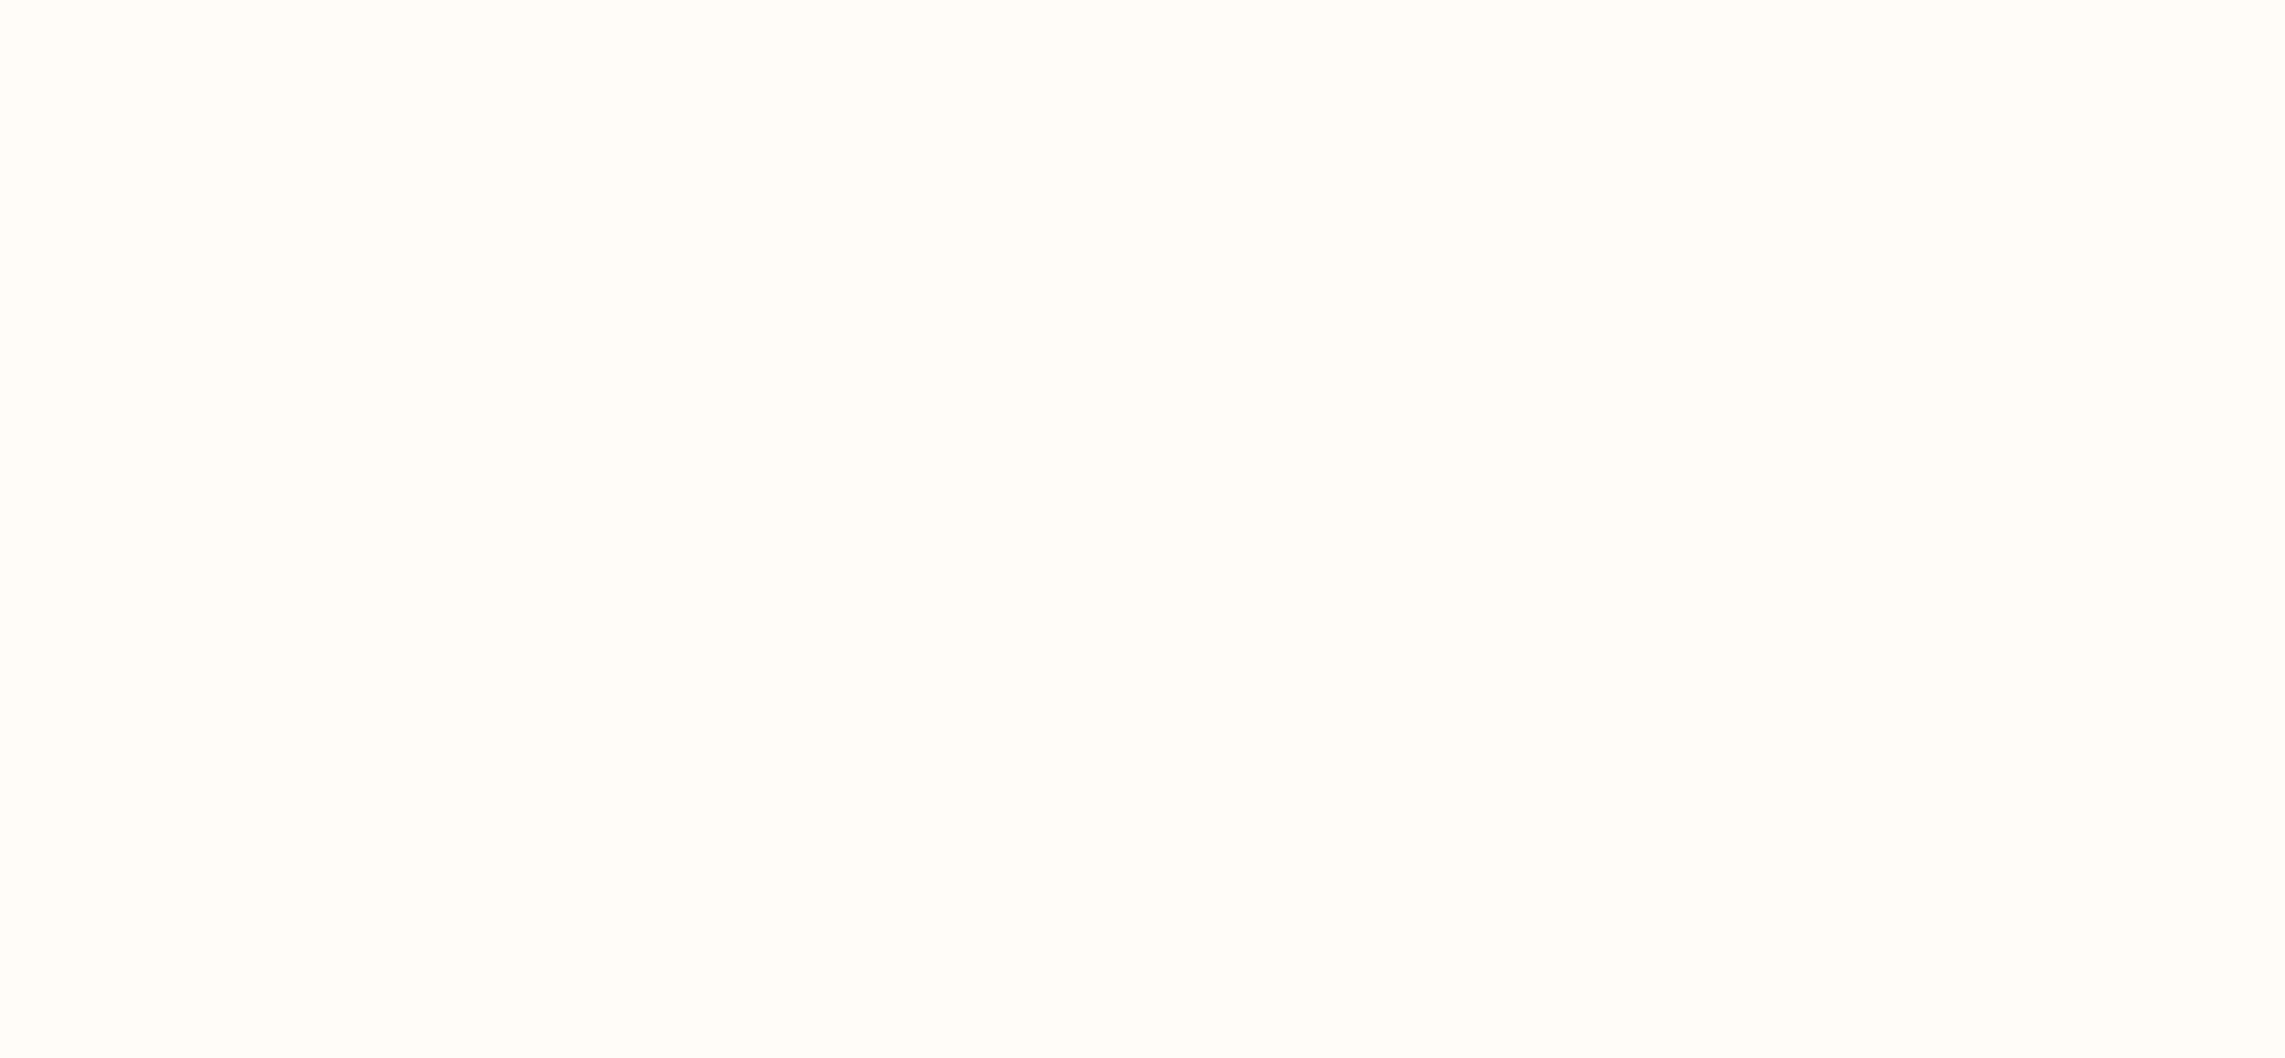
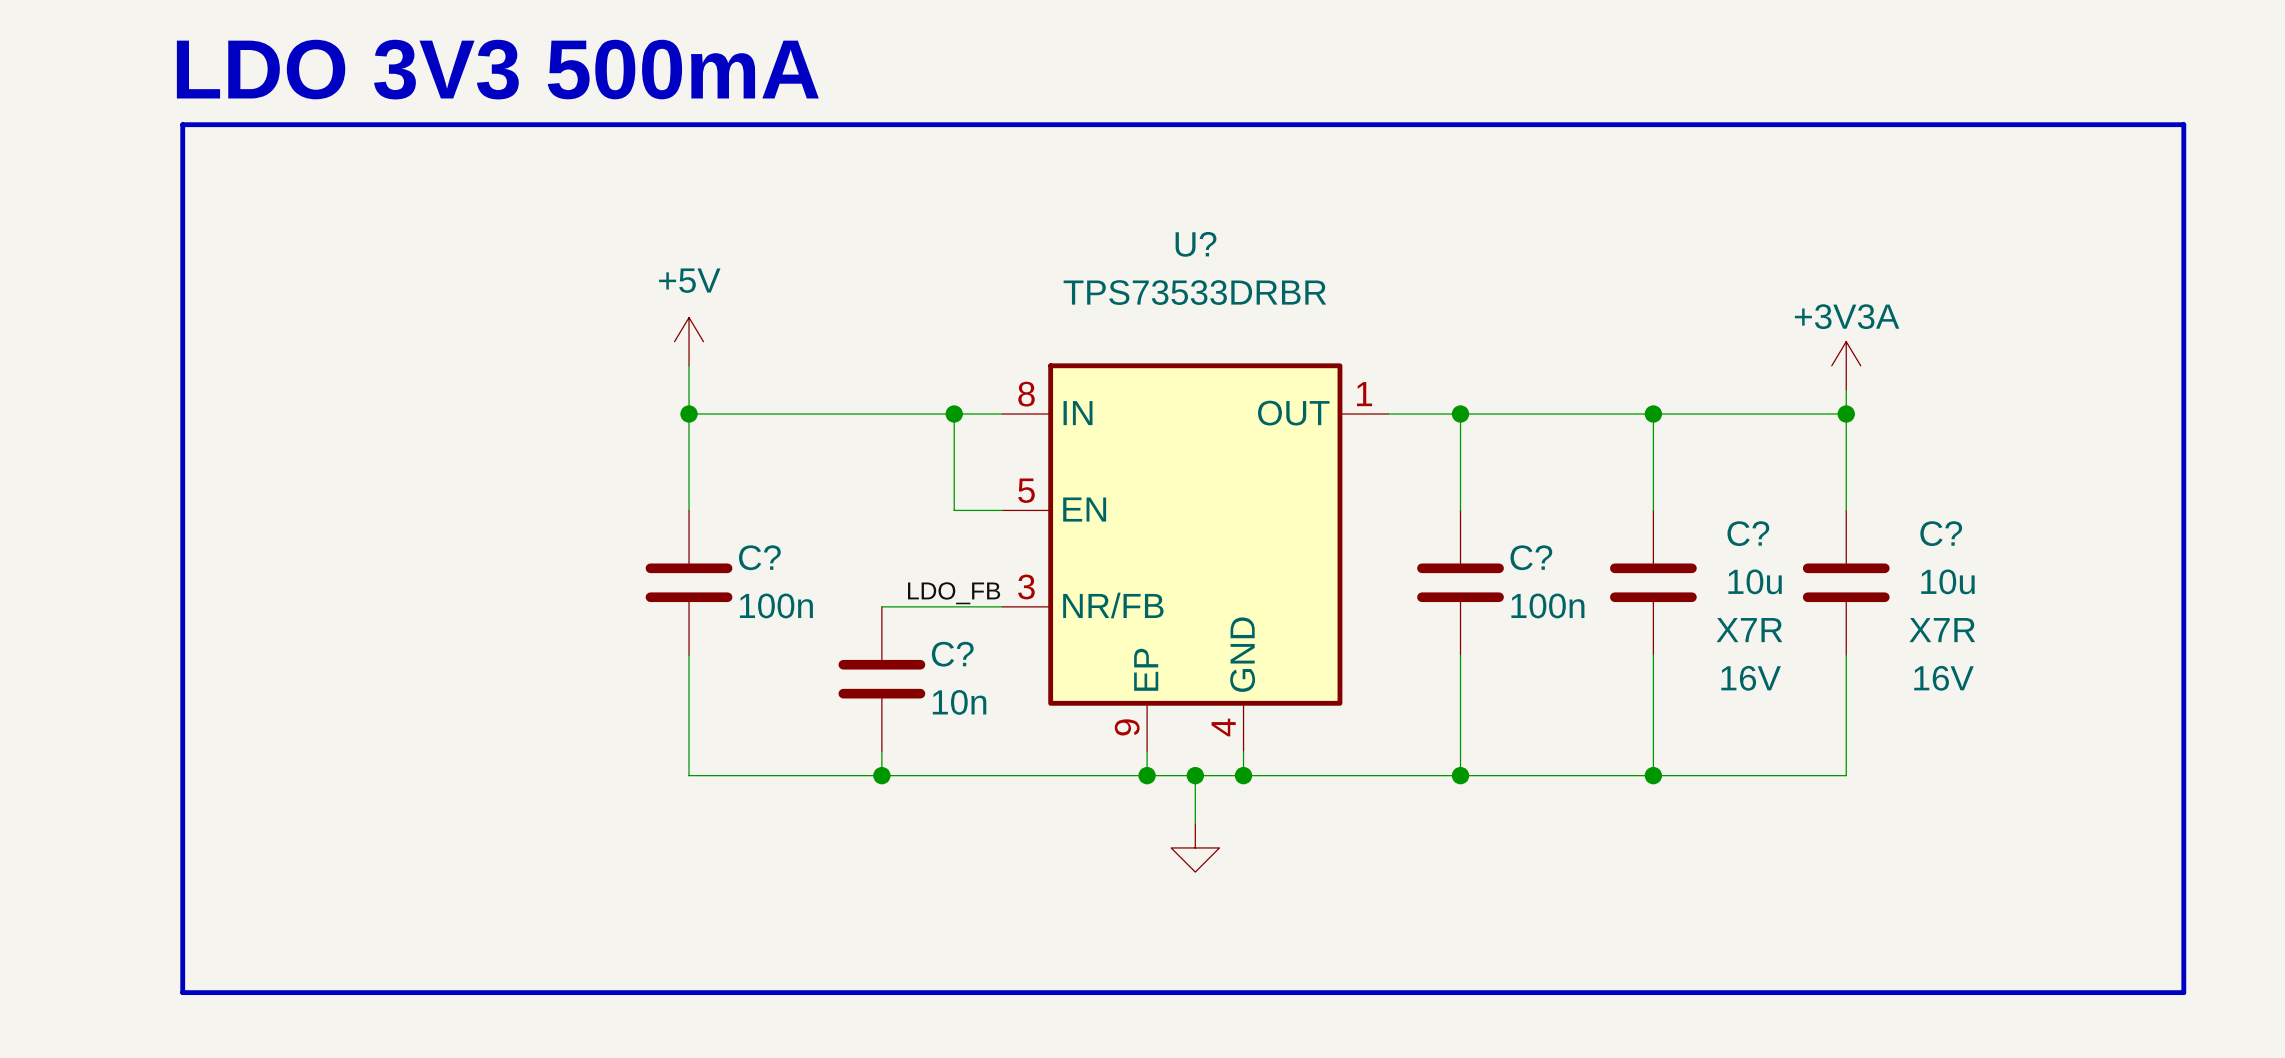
text: none -> LDO 3V3 500mA (497, 69)
line: none -> (182, 124) (2183, 124) (2183, 992) (182, 992) (182, 124)
power symbol: none -> +5V (689, 341)
wire: none -> (689, 365) (689, 510)
power symbol: none -> +3V3A (1846, 365)
wire: none -> (1846, 389) (1846, 510)
wire: none -> (689, 414) (1002, 414)
junction: none -> (689, 414)
wire: none -> (954, 414) (954, 510) (1002, 510)
junction: none -> (954, 414)
wire: none -> (1388, 414) (1846, 414)
wire: none -> (1460, 414) (1460, 510)
junction: none -> (1460, 414)
wire: none -> (1653, 414) (1653, 510)
junction: none -> (1653, 414)
junction: none -> (1846, 414)
U?: none -> TPS73533DRBR (1195, 557)
C?: none -> 100n (689, 582)
C?: none -> 100n (1460, 582)
C?: none -> 10u (1653, 582)
C?: none -> 10u (1846, 582)
label: none -> LDO_FB (954, 593)
wire: none -> (881, 606) (1002, 606)
wire: none -> (689, 655) (689, 775) (1846, 775) (1846, 655)
wire: none -> (1460, 655) (1460, 775)
wire: none -> (1653, 655) (1653, 775)
C?: none -> 10n (881, 679)
wire: none -> (881, 751) (881, 775)
wire: none -> (1147, 751) (1147, 775)
wire: none -> (1243, 751) (1243, 775)
junction: none -> (881, 775)
junction: none -> (1147, 775)
wire: none -> (1195, 775) (1195, 823)
junction: none -> (1195, 775)
junction: none -> (1243, 775)
junction: none -> (1460, 775)
junction: none -> (1653, 775)
power symbol: none -> (1195, 847)

